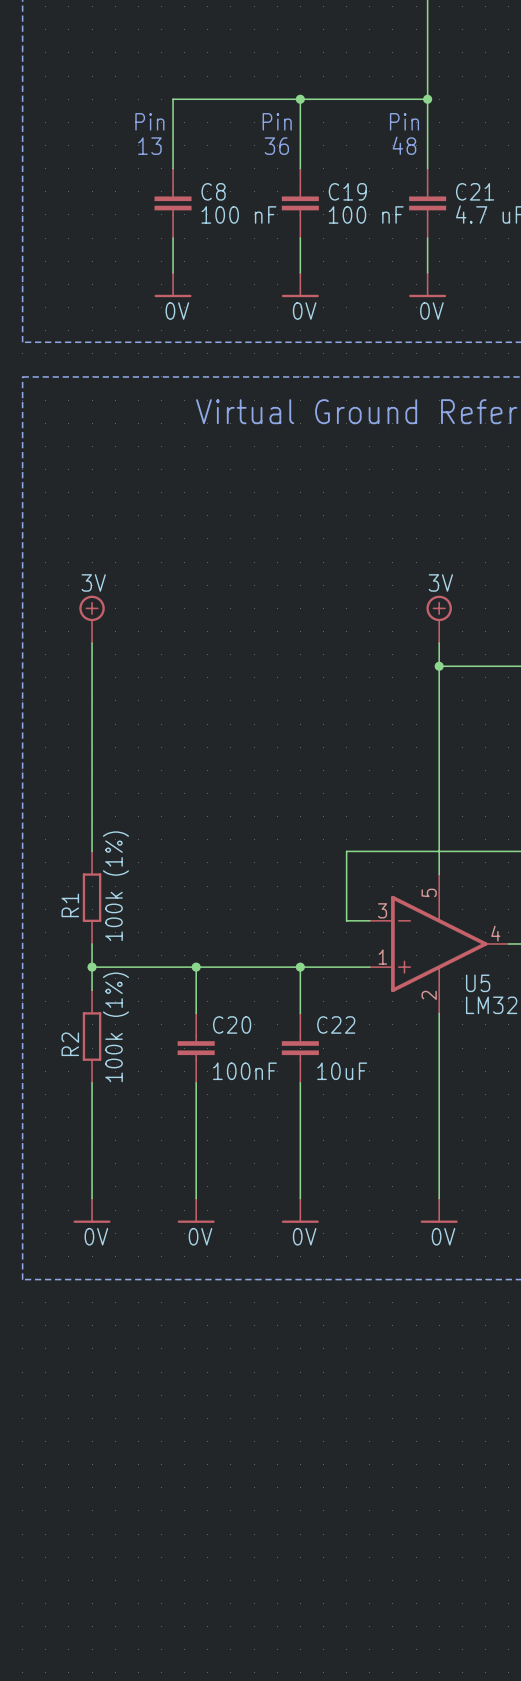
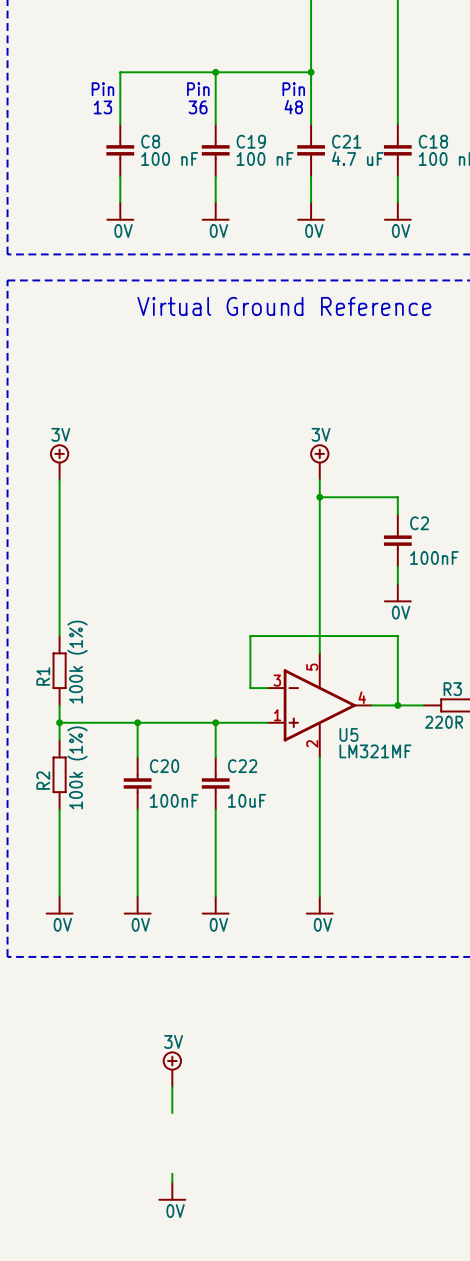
power symbol: none -> 3V (172, 1069)
wire: none -> (172, 1087) (172, 1113)
wire: none -> (172, 1173) (172, 1182)
power symbol: none -> 0V (172, 1191)

